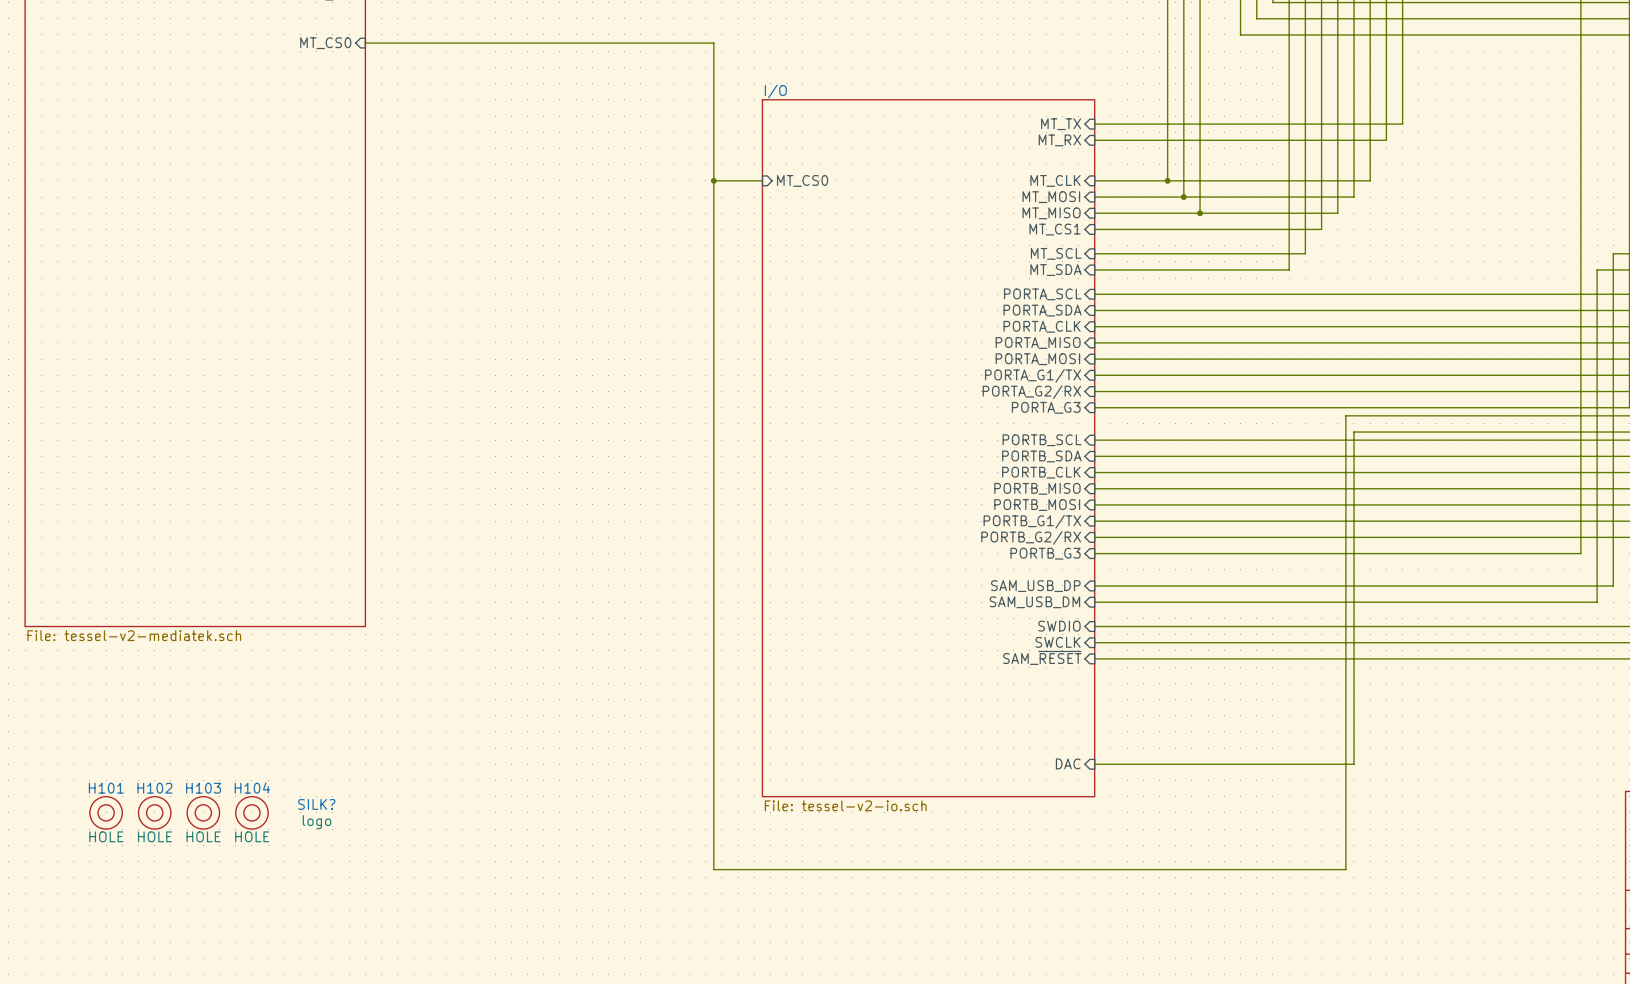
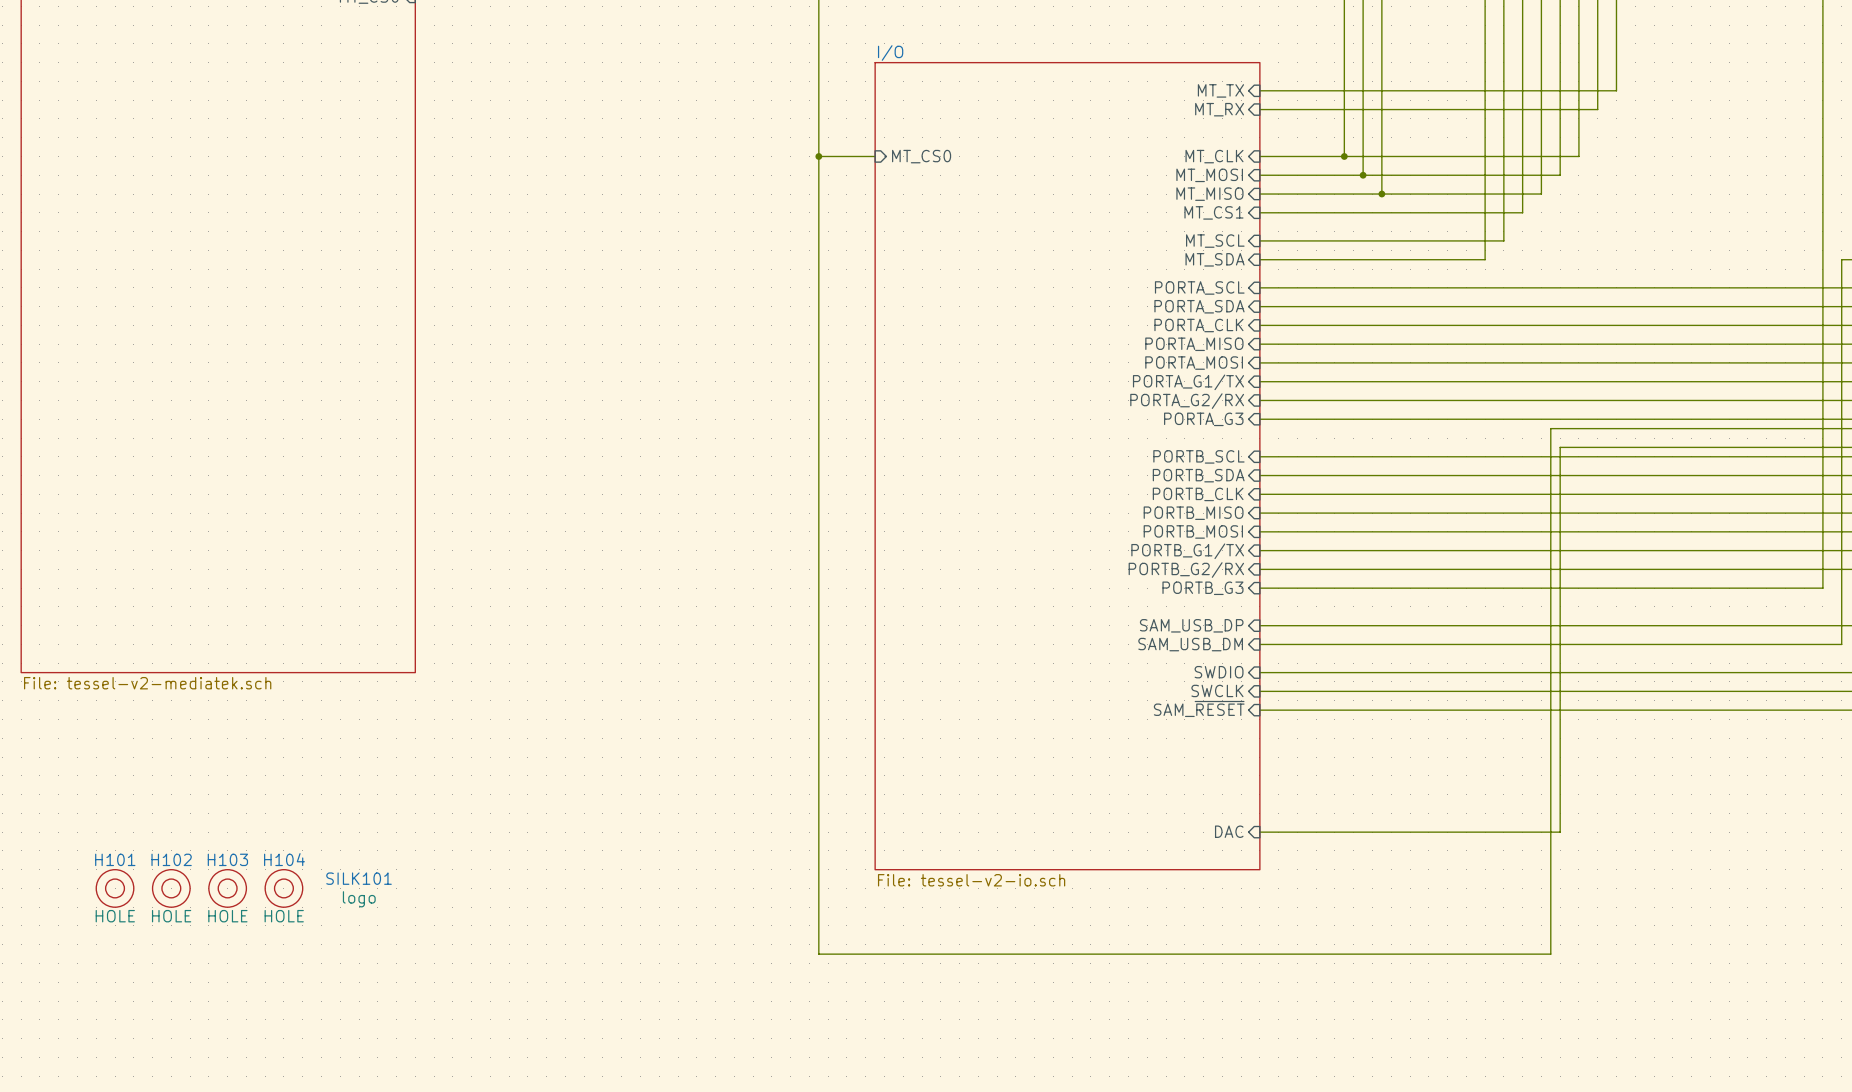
SILK? name: SILK? (316, 804) -> SILK101 (359, 878)

